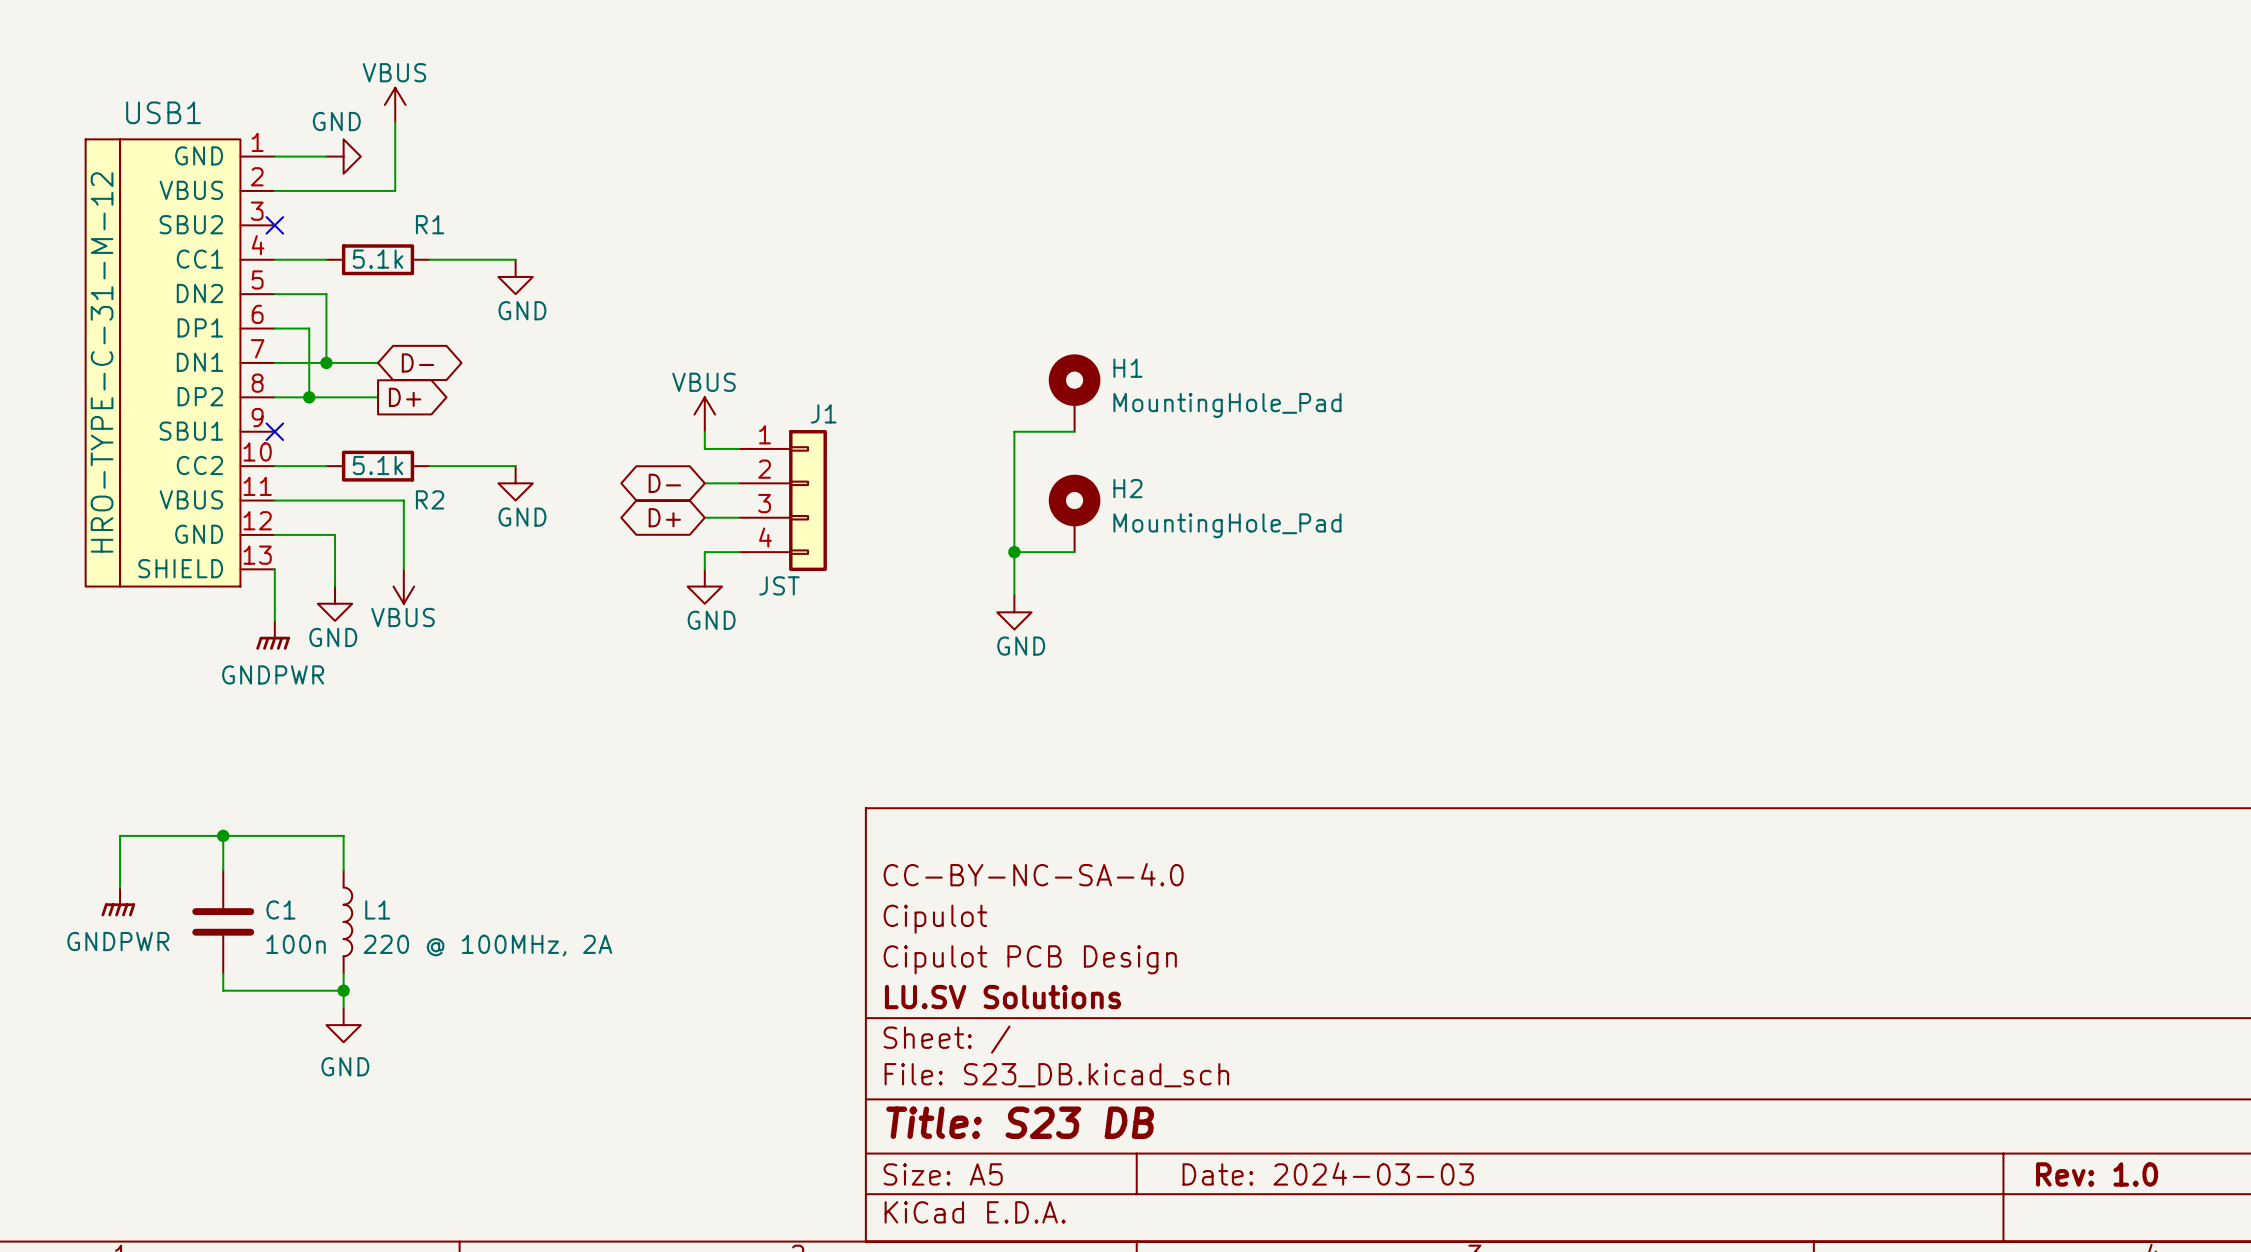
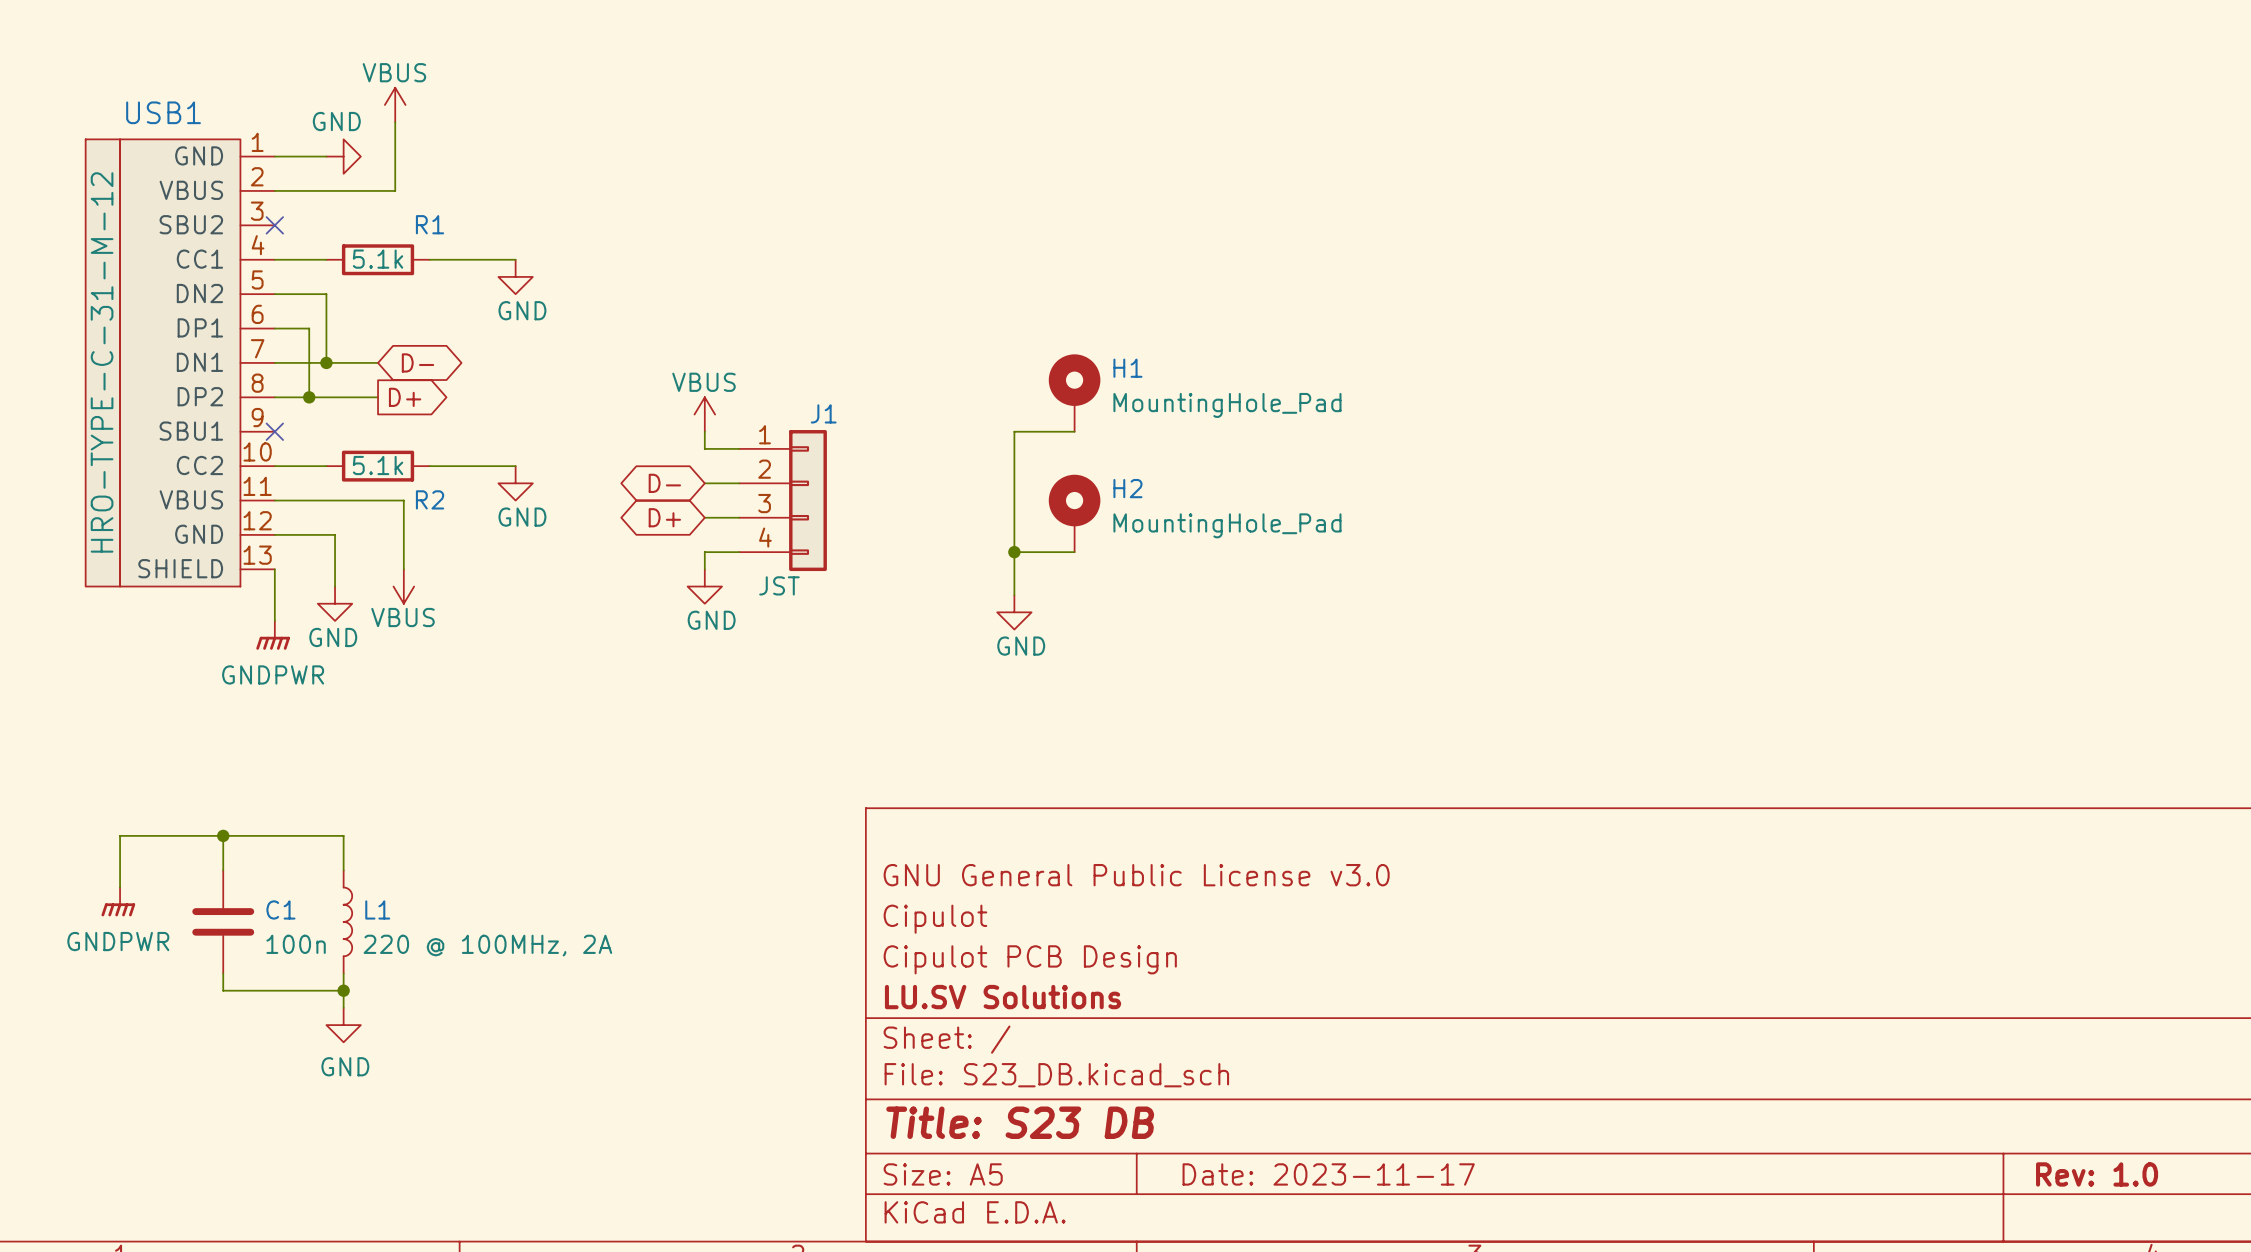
title block: CC-BY-NC-SA-4.0 (1033, 874) -> GNU General Public License v3.0 (1136, 875)
title block: Date: 2024-03-03 (1328, 1173) -> Date: 2023-11-17 (1328, 1174)

